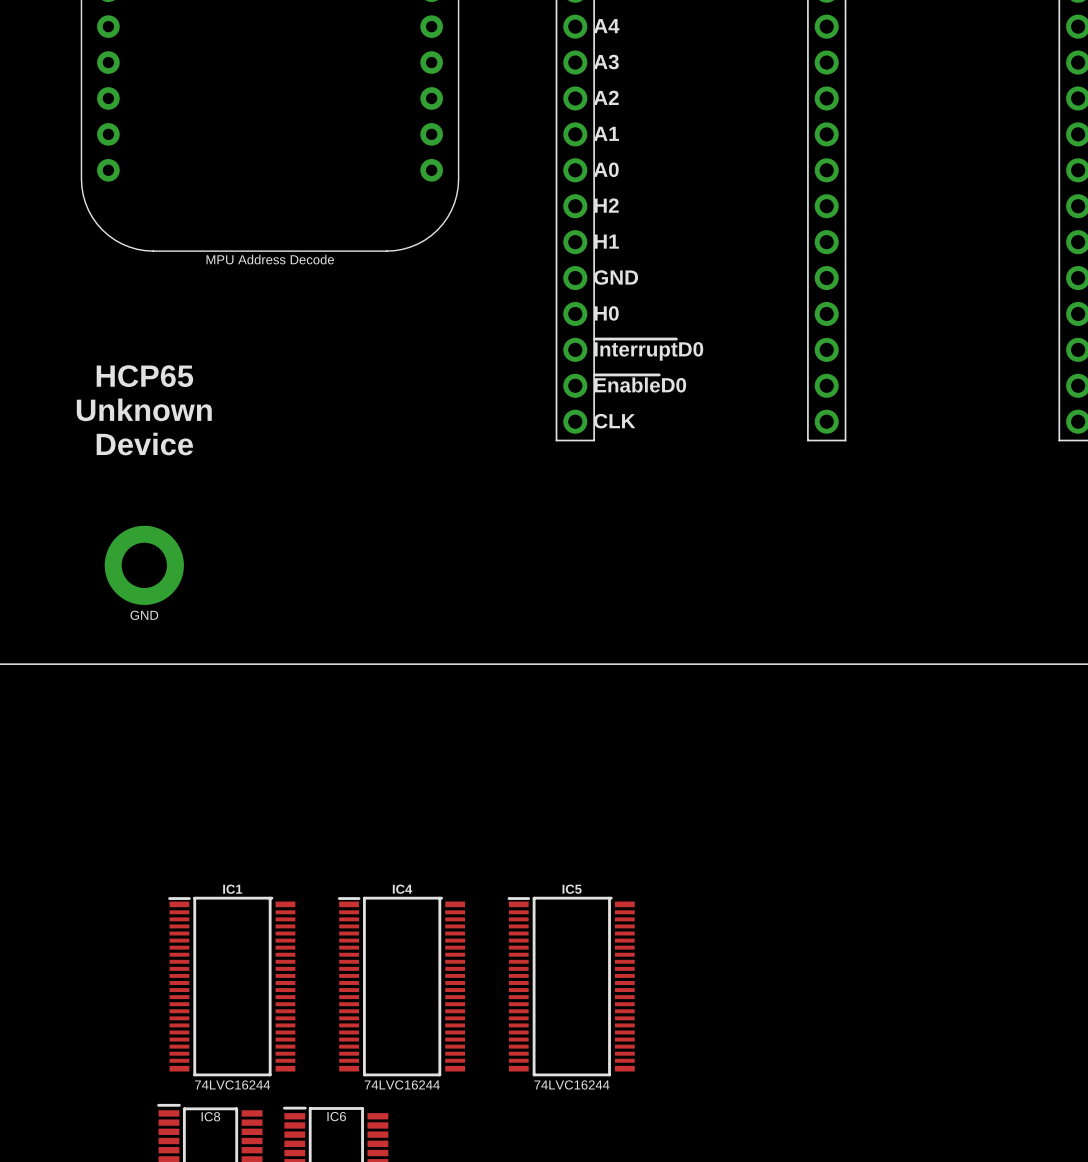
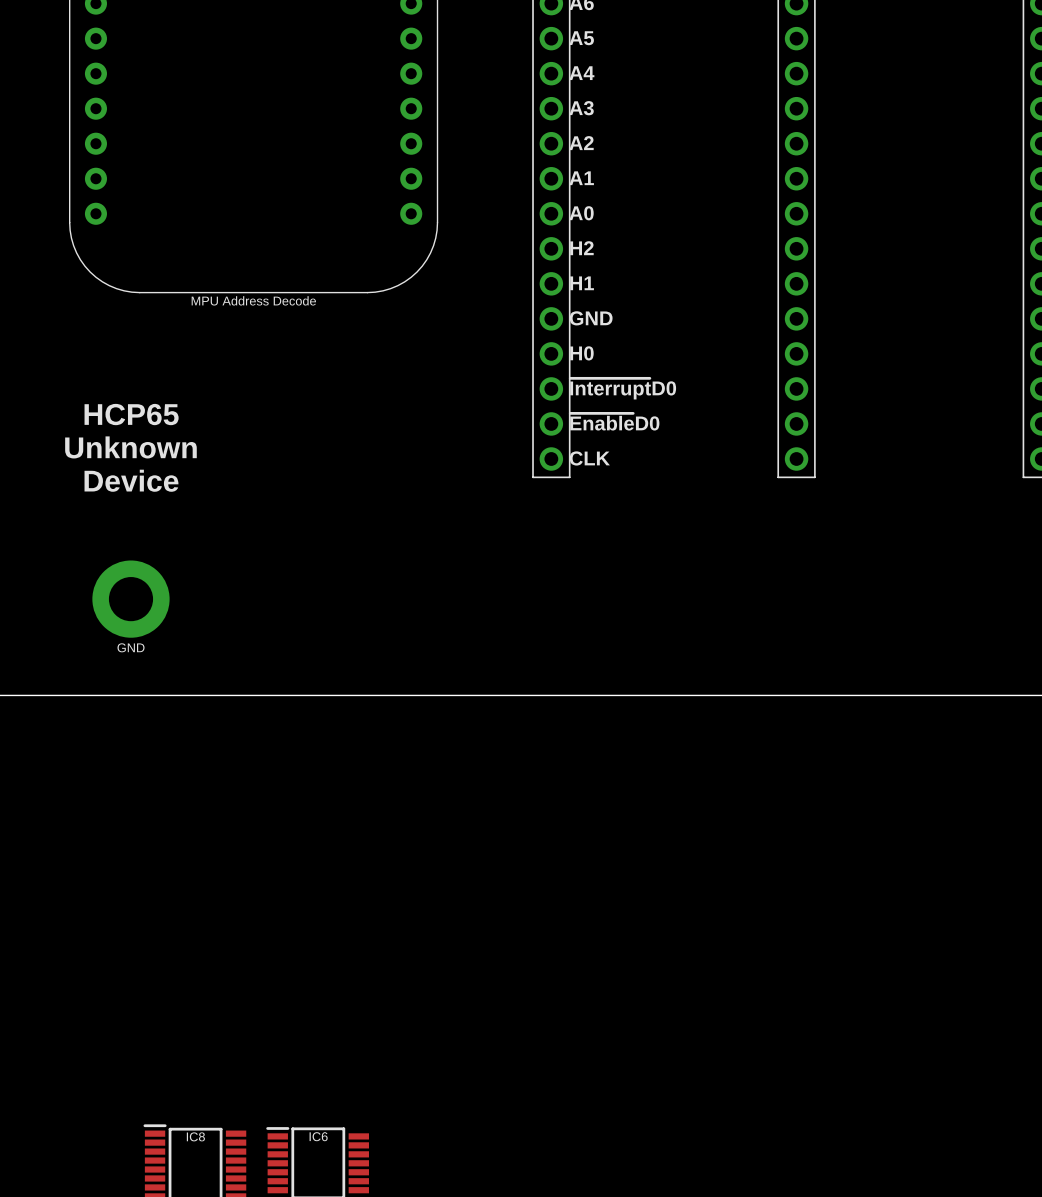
IC1: (231, 986) -> none
IC4: (401, 986) -> none
IC5: (571, 986) -> none

